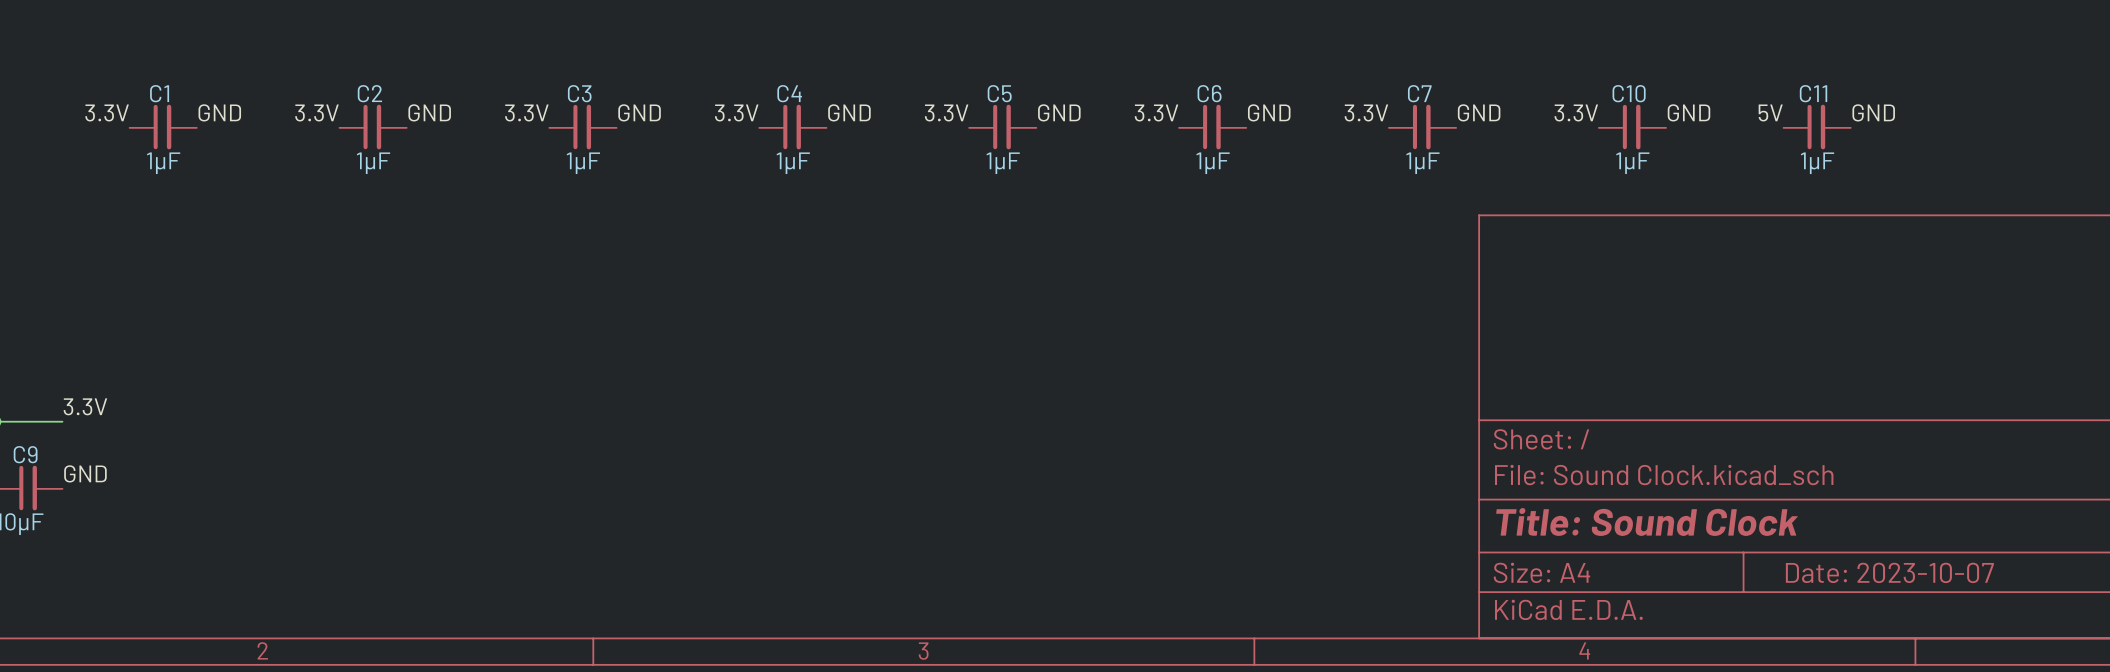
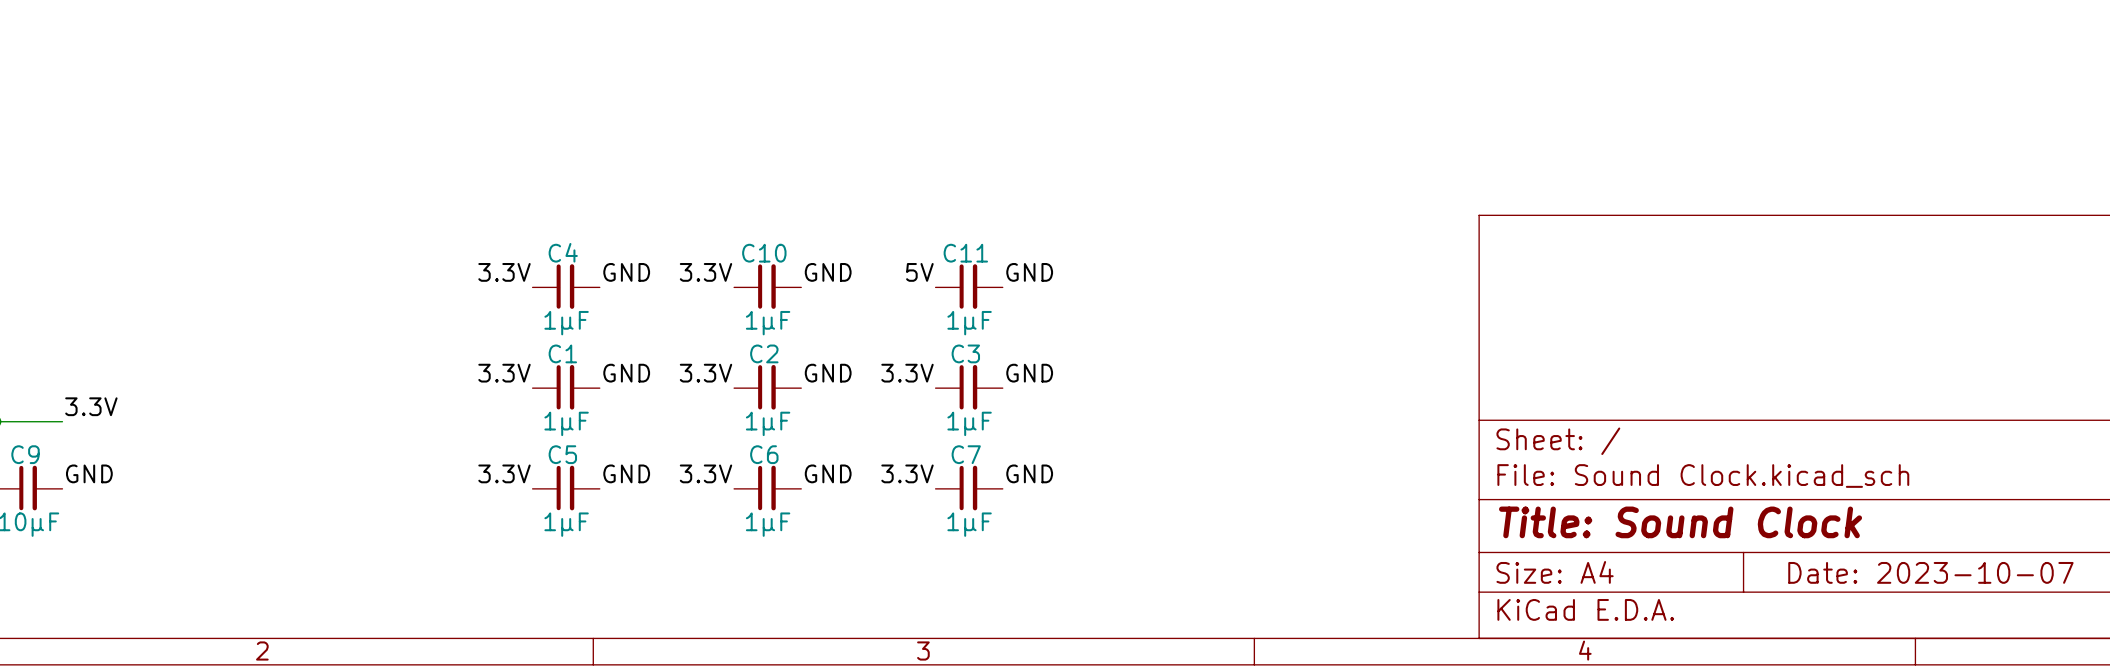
label: 3.3V (107, 112) -> none
label: GND (219, 112) -> none
label: 3.3V (316, 112) -> none
label: GND (429, 112) -> none
label: 3.3V (526, 112) -> none
label: GND (639, 112) -> none
label: 3.3V (736, 112) -> none
label: GND (849, 112) -> none
label: 3.3V (946, 112) -> none
label: GND (1059, 112) -> none
label: 3.3V (1156, 112) -> none
label: GND (1269, 112) -> none
label: 3.3V (1366, 112) -> none
label: GND (1479, 112) -> none
label: 3.3V (1576, 112) -> none
label: GND (1688, 112) -> none
label: 5V (1770, 112) -> none
label: GND (1873, 112) -> none
C1 position: (163, 127) -> (566, 387)
C2 position: (373, 127) -> (767, 387)
C3 position: (582, 127) -> (969, 387)
C4 position: (792, 127) -> (566, 286)
C5 position: (1002, 127) -> (566, 488)
C6 position: (1212, 127) -> (767, 488)
C7 position: (1422, 127) -> (969, 488)
C10 position: (1632, 127) -> (767, 286)
C11 position: (1817, 127) -> (969, 286)
label: none -> 3.3V (504, 272)
label: none -> GND (626, 272)
label: none -> 3.3V (705, 272)
label: none -> GND (828, 272)
label: none -> 5V (919, 272)
label: none -> GND (1029, 272)
label: none -> 3.3V (504, 373)
label: none -> GND (626, 373)
label: none -> 3.3V (705, 373)
label: none -> GND (828, 373)
label: none -> 3.3V (907, 373)
label: none -> GND (1029, 373)
label: none -> 3.3V (504, 473)
label: none -> GND (626, 473)
label: none -> 3.3V (705, 473)
label: none -> GND (828, 473)
label: none -> 3.3V (907, 473)
label: none -> GND (1029, 473)

